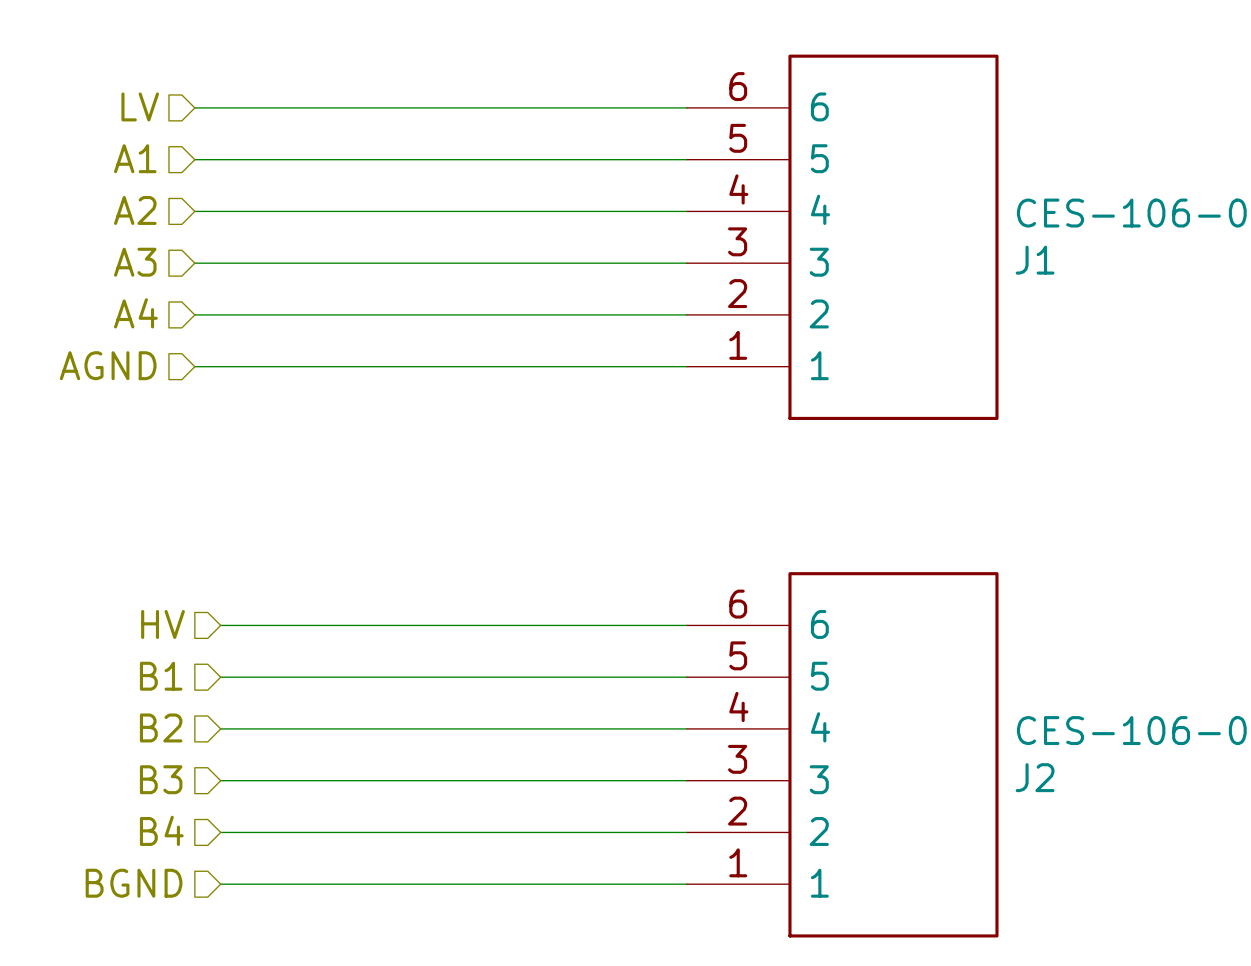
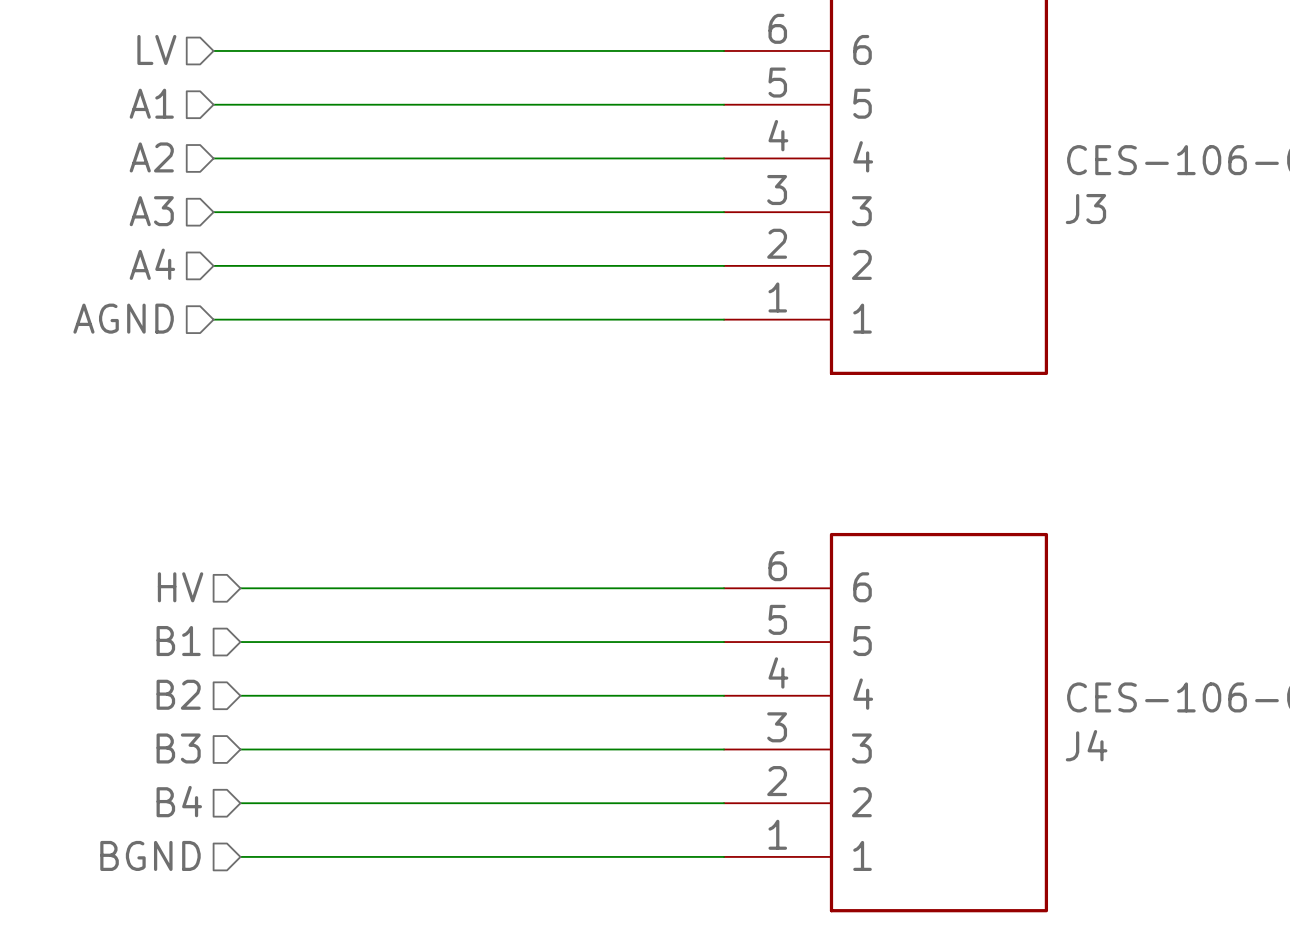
J1 name: J1 (1035, 260) -> J3 (1085, 209)
J2 name: J2 (1035, 777) -> J4 (1086, 745)

